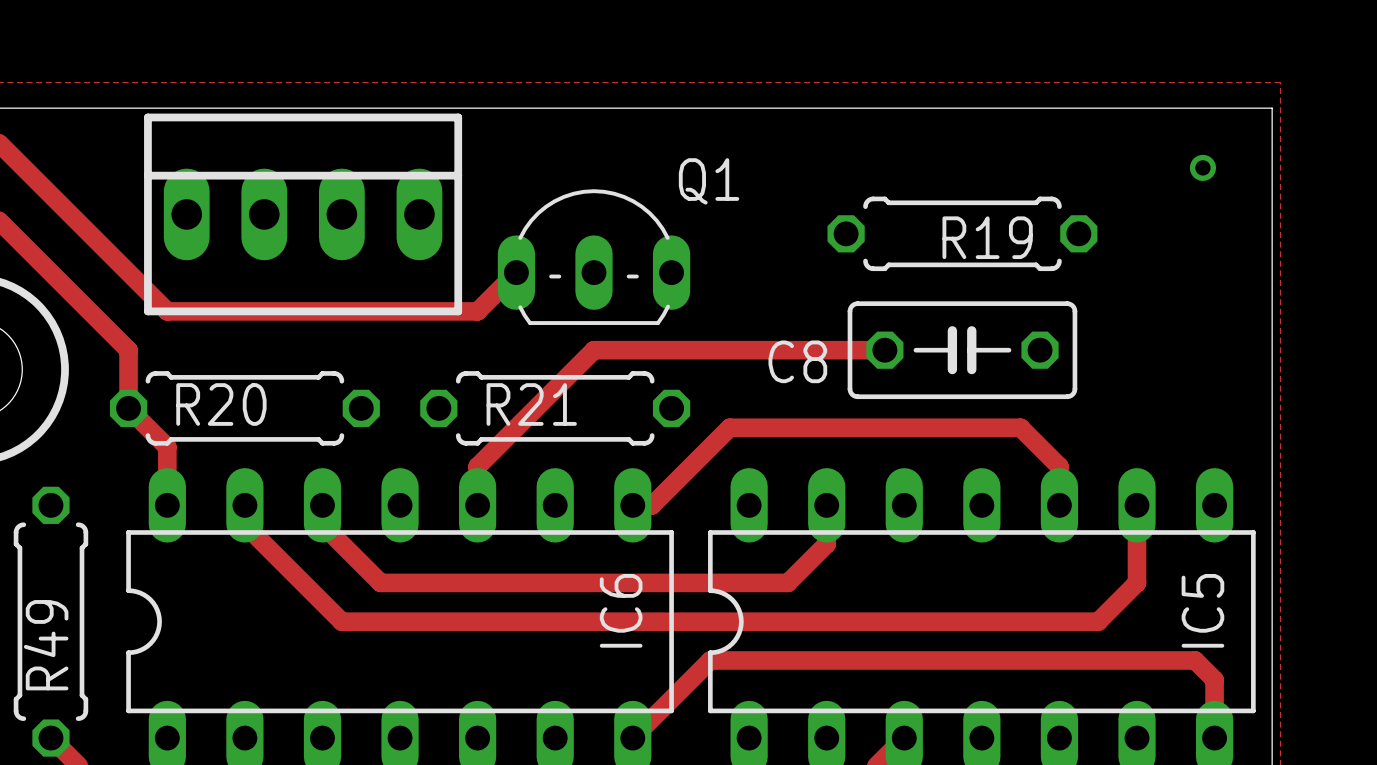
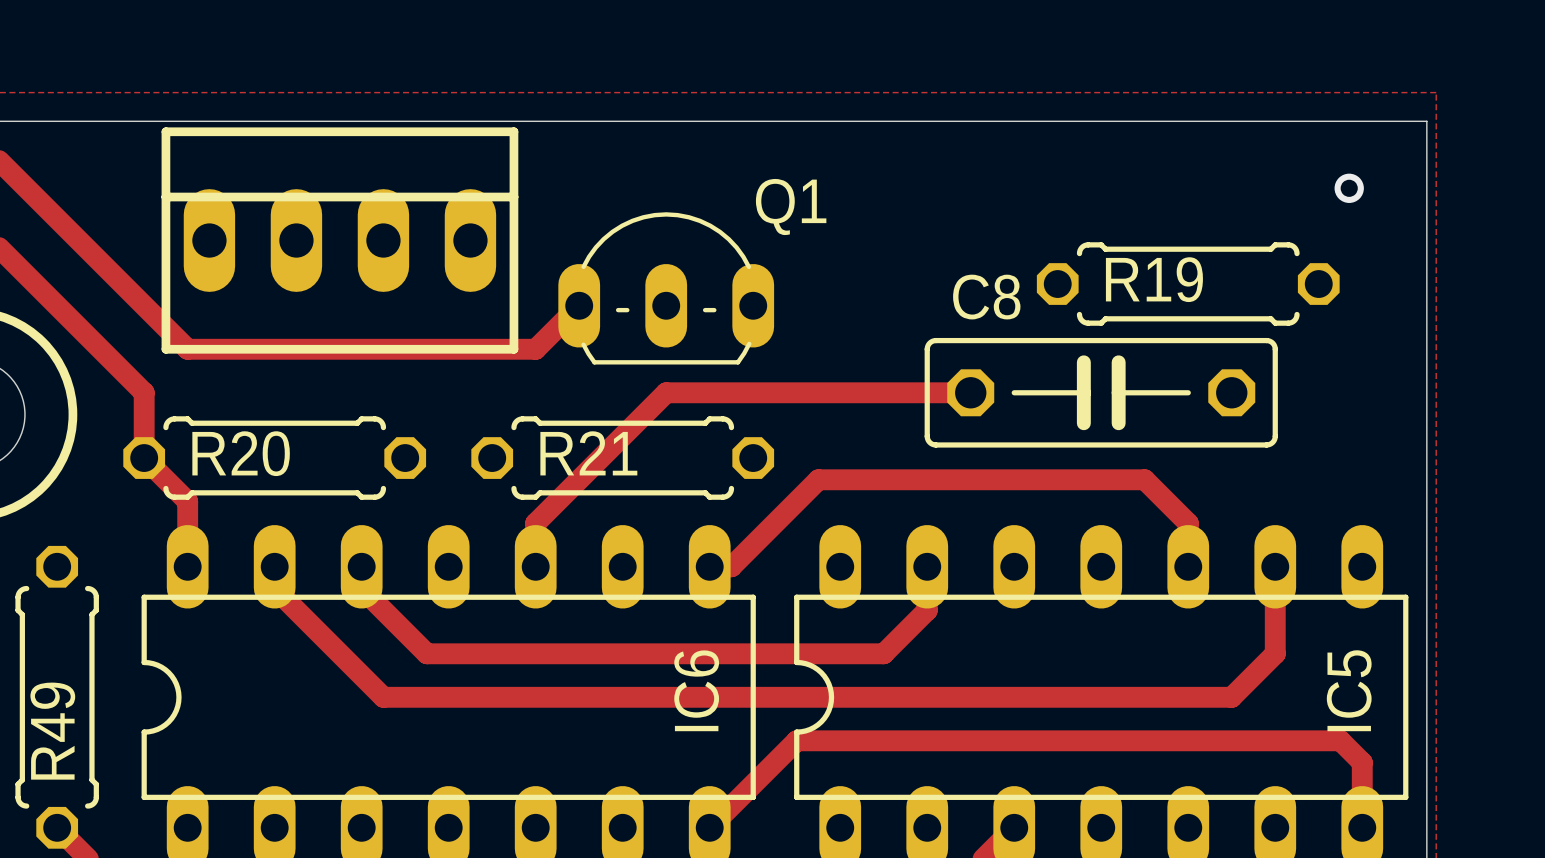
R19 position: (962, 233) -> (1188, 284)
R19 name position: R19 (987, 237) -> R19 (1154, 279)
C8 footprint: [847, 301, 1078, 400] -> [924, 337, 1278, 448]
C8 name position: C8 (797, 361) -> C8 (986, 297)

